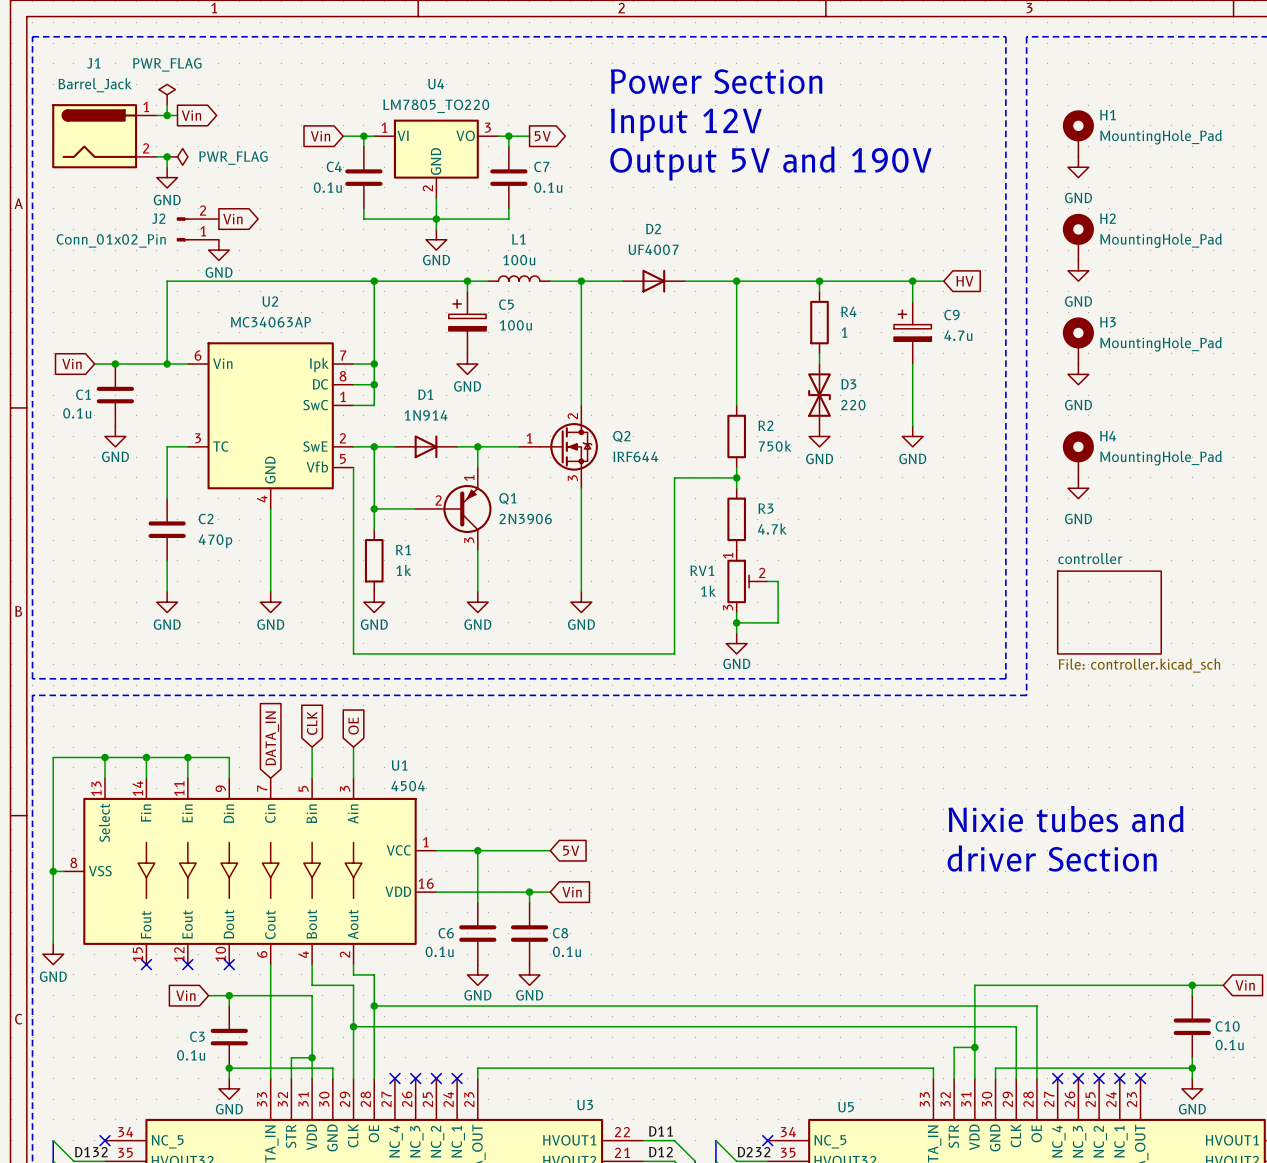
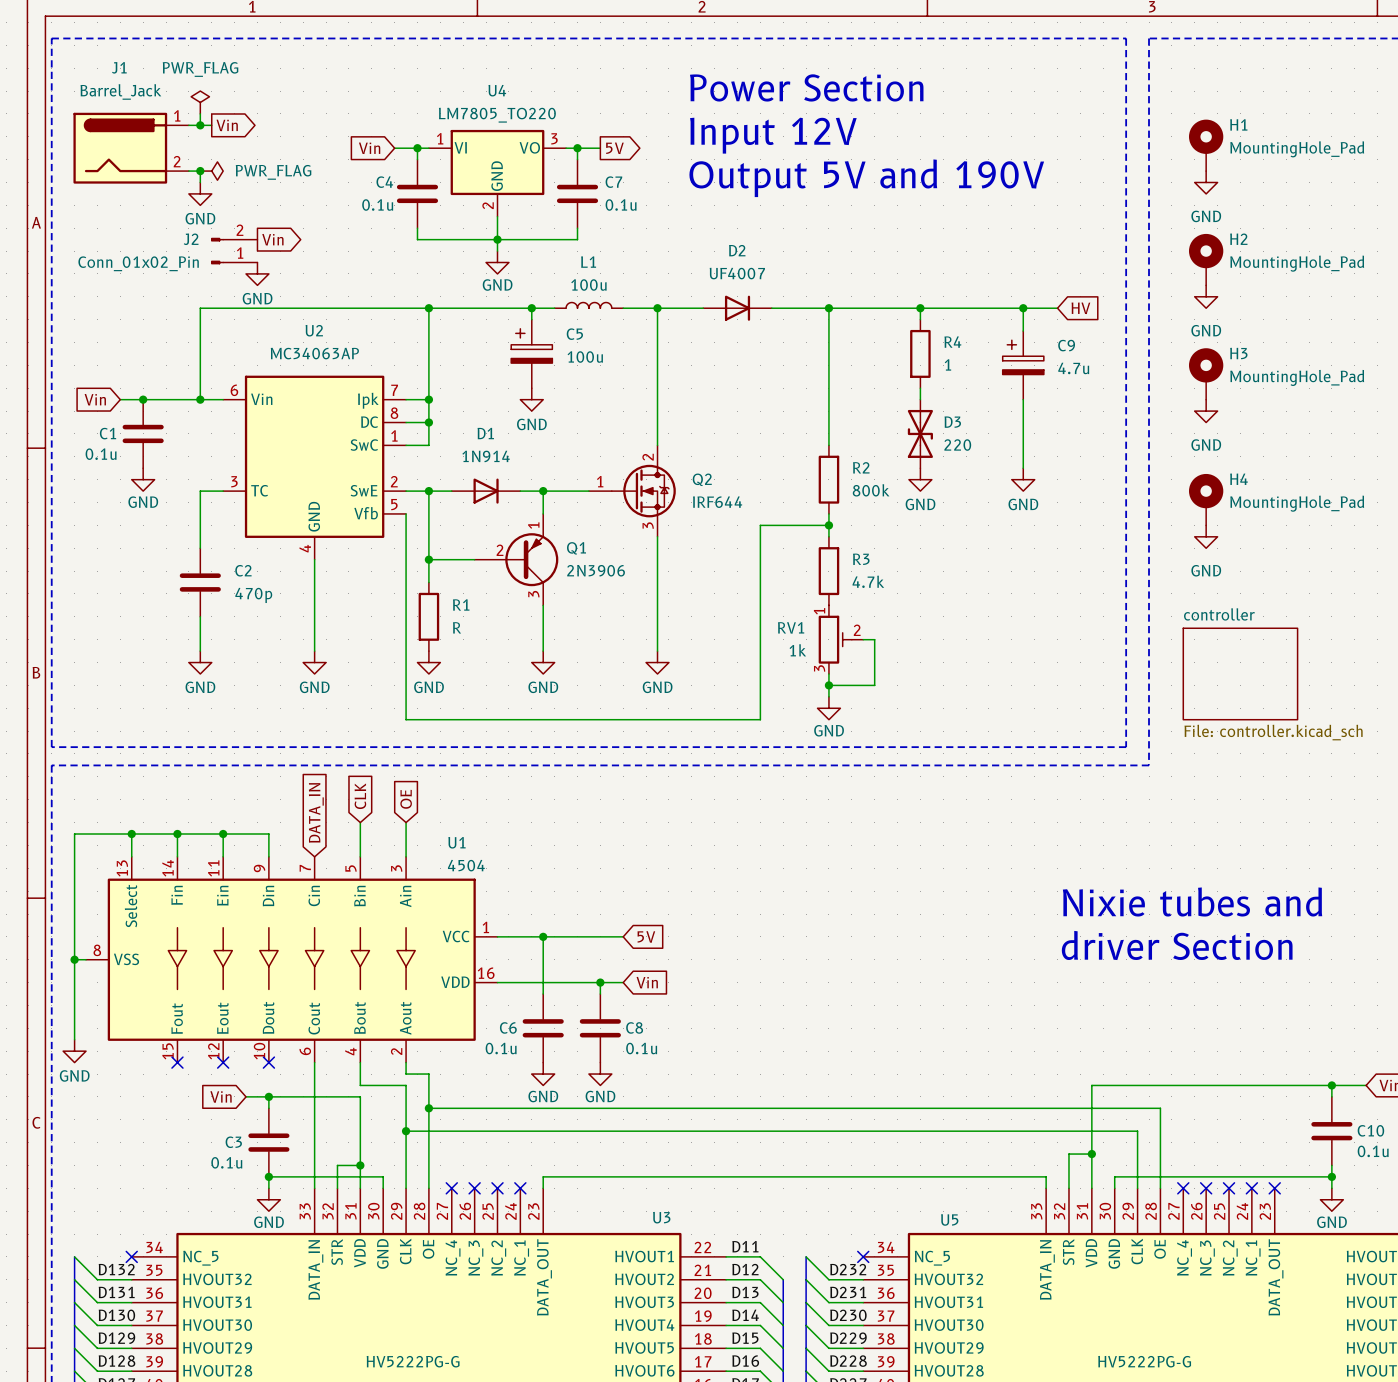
R2 value: 750k (775, 446) -> 800k (871, 490)
R1 value: 1k (403, 570) -> R (456, 627)

